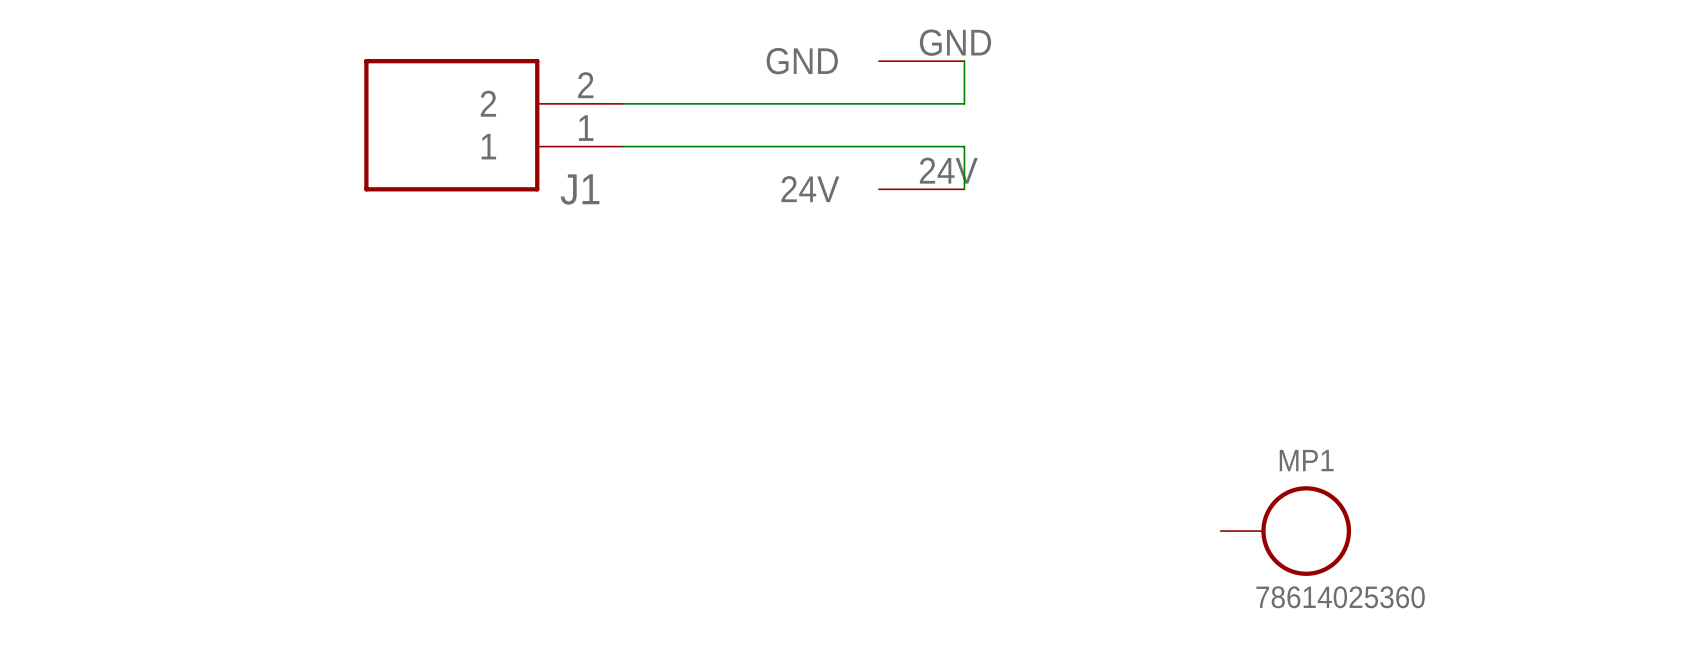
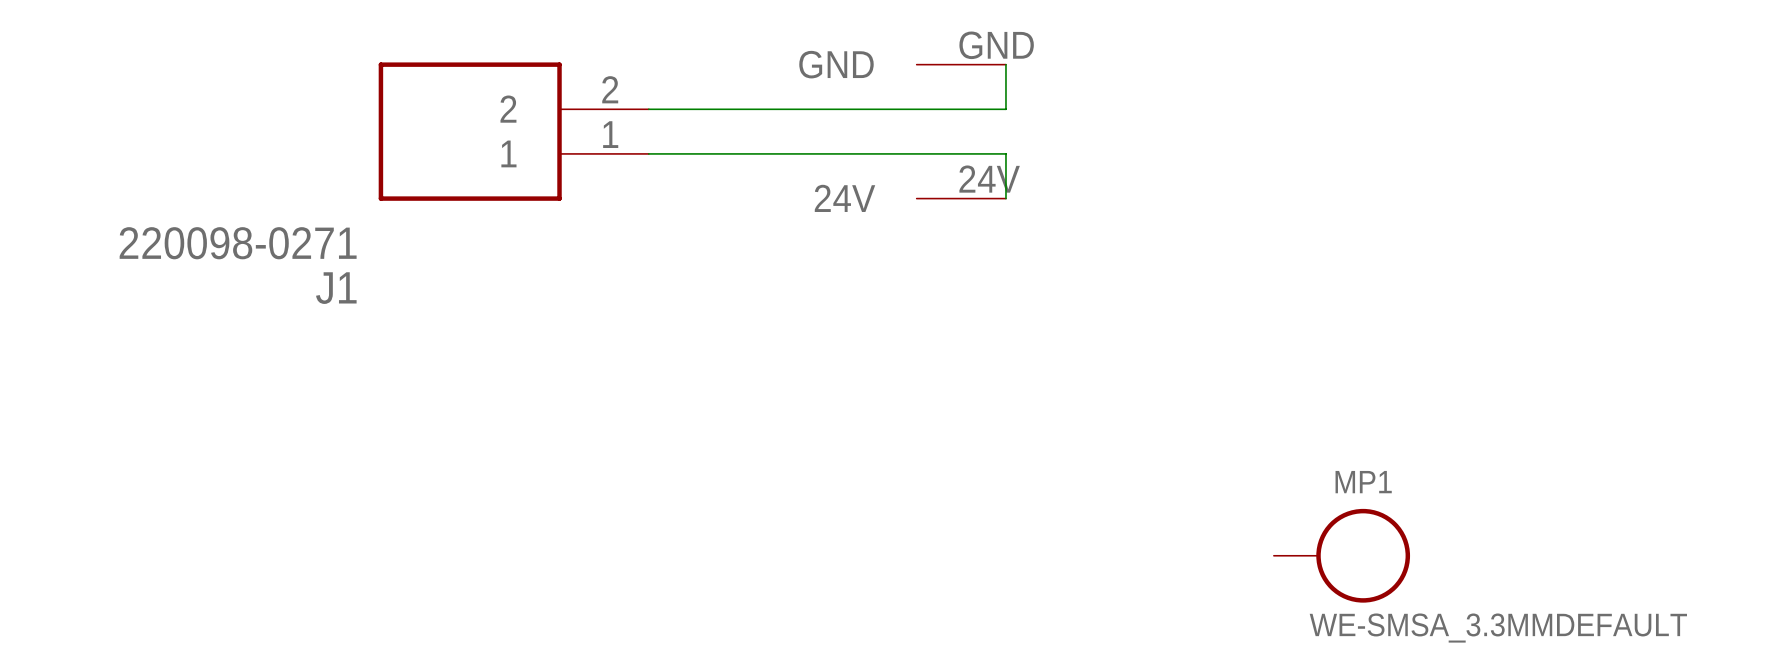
J1 name position: J1 (580, 189) -> J1 (336, 288)
J1 value: none -> 220098-0271 (238, 243)
MP1 value: 78614025360 (1340, 597) -> WE-SMSA_3.3MMDEFAULT (1498, 628)

